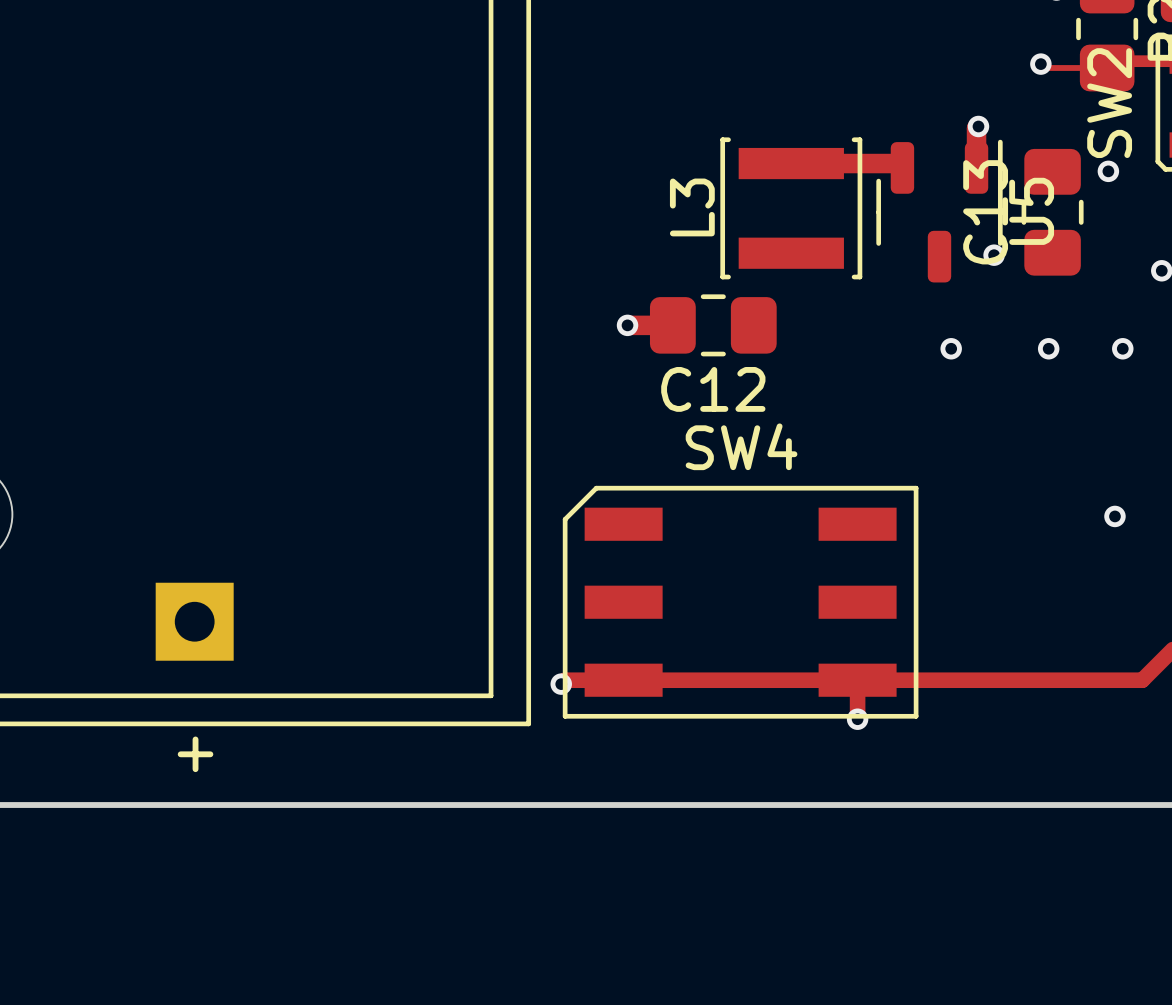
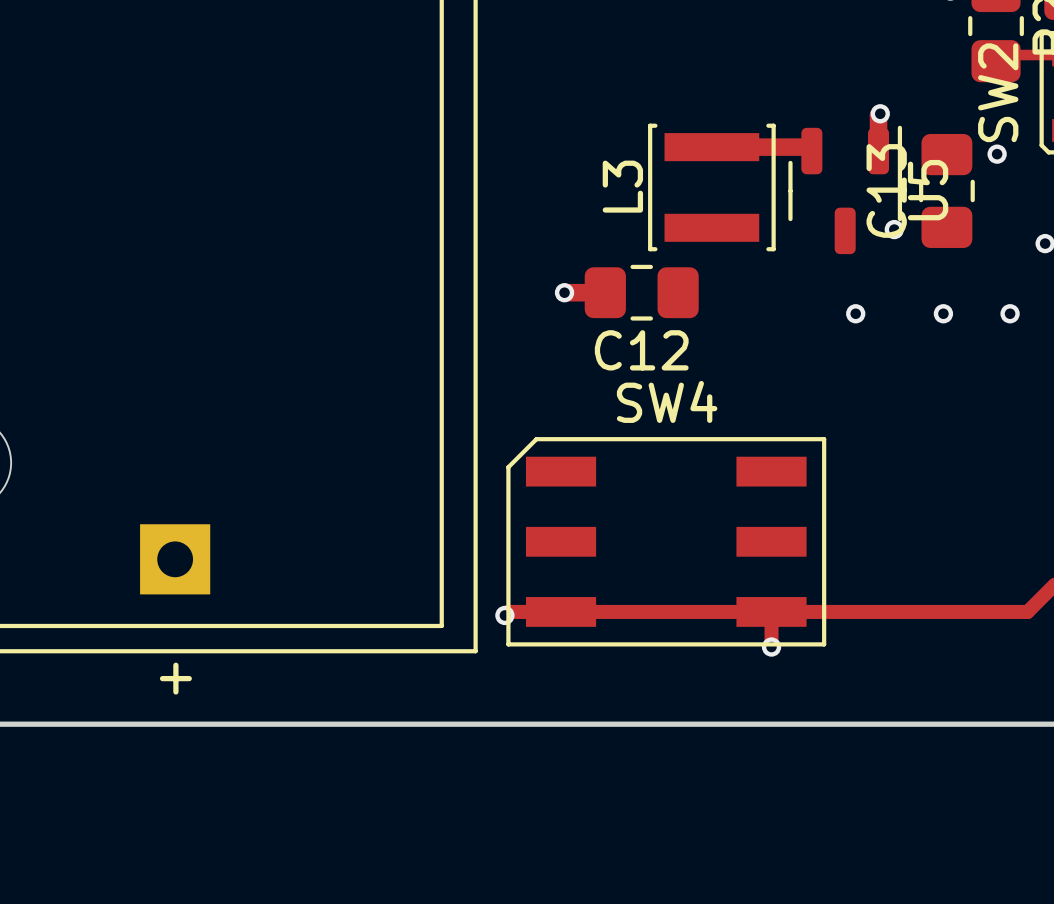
track: (1040, 64) (1044, 68) (1107, 68) -> none
via: (1040, 64) -> none
via: (1114, 516) -> none

